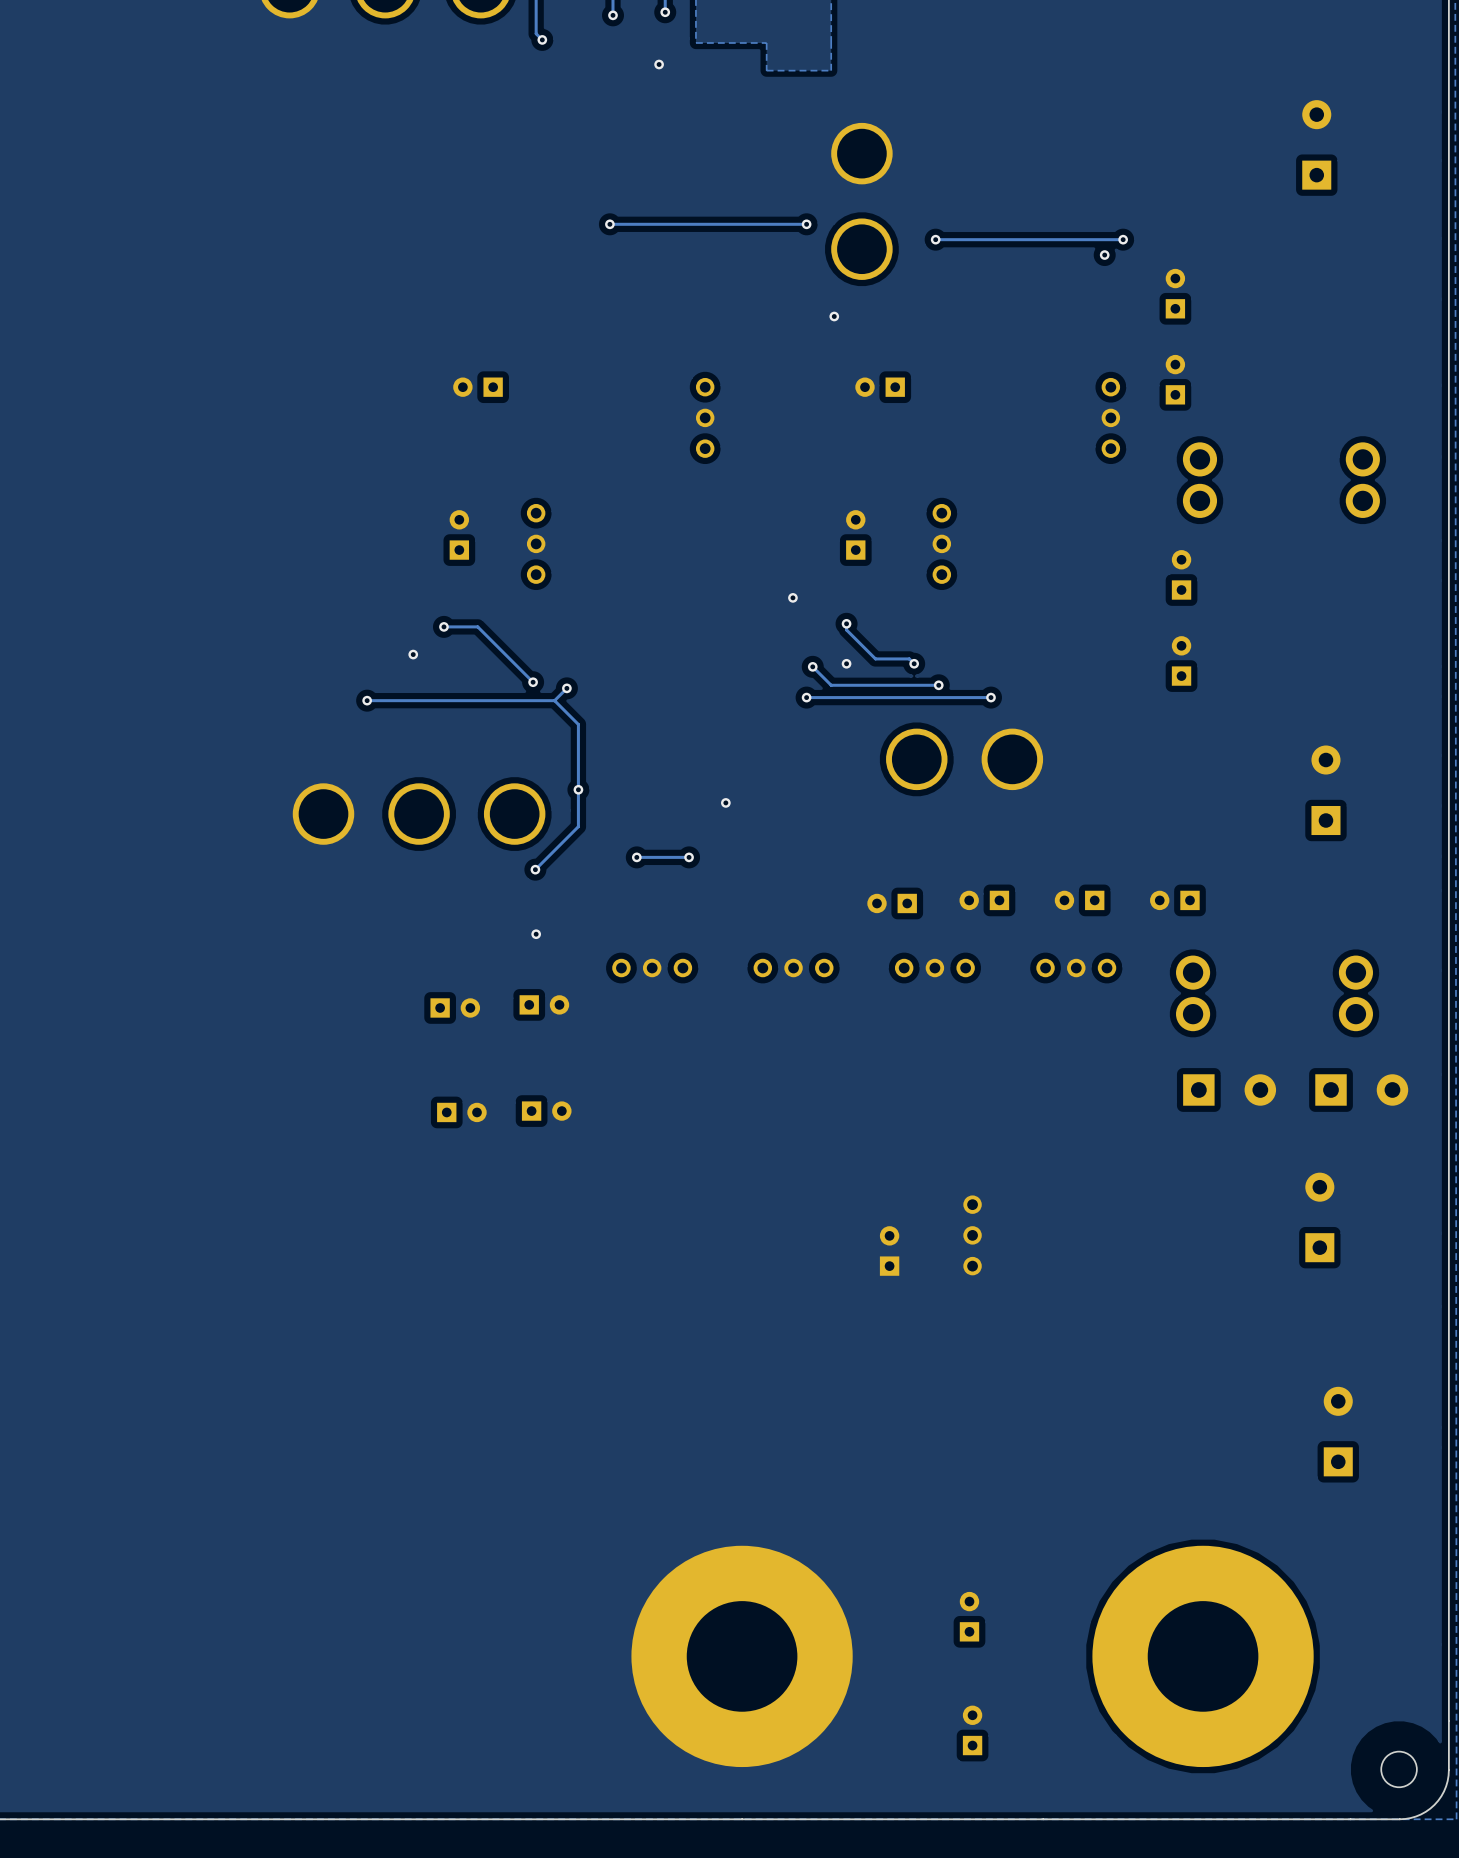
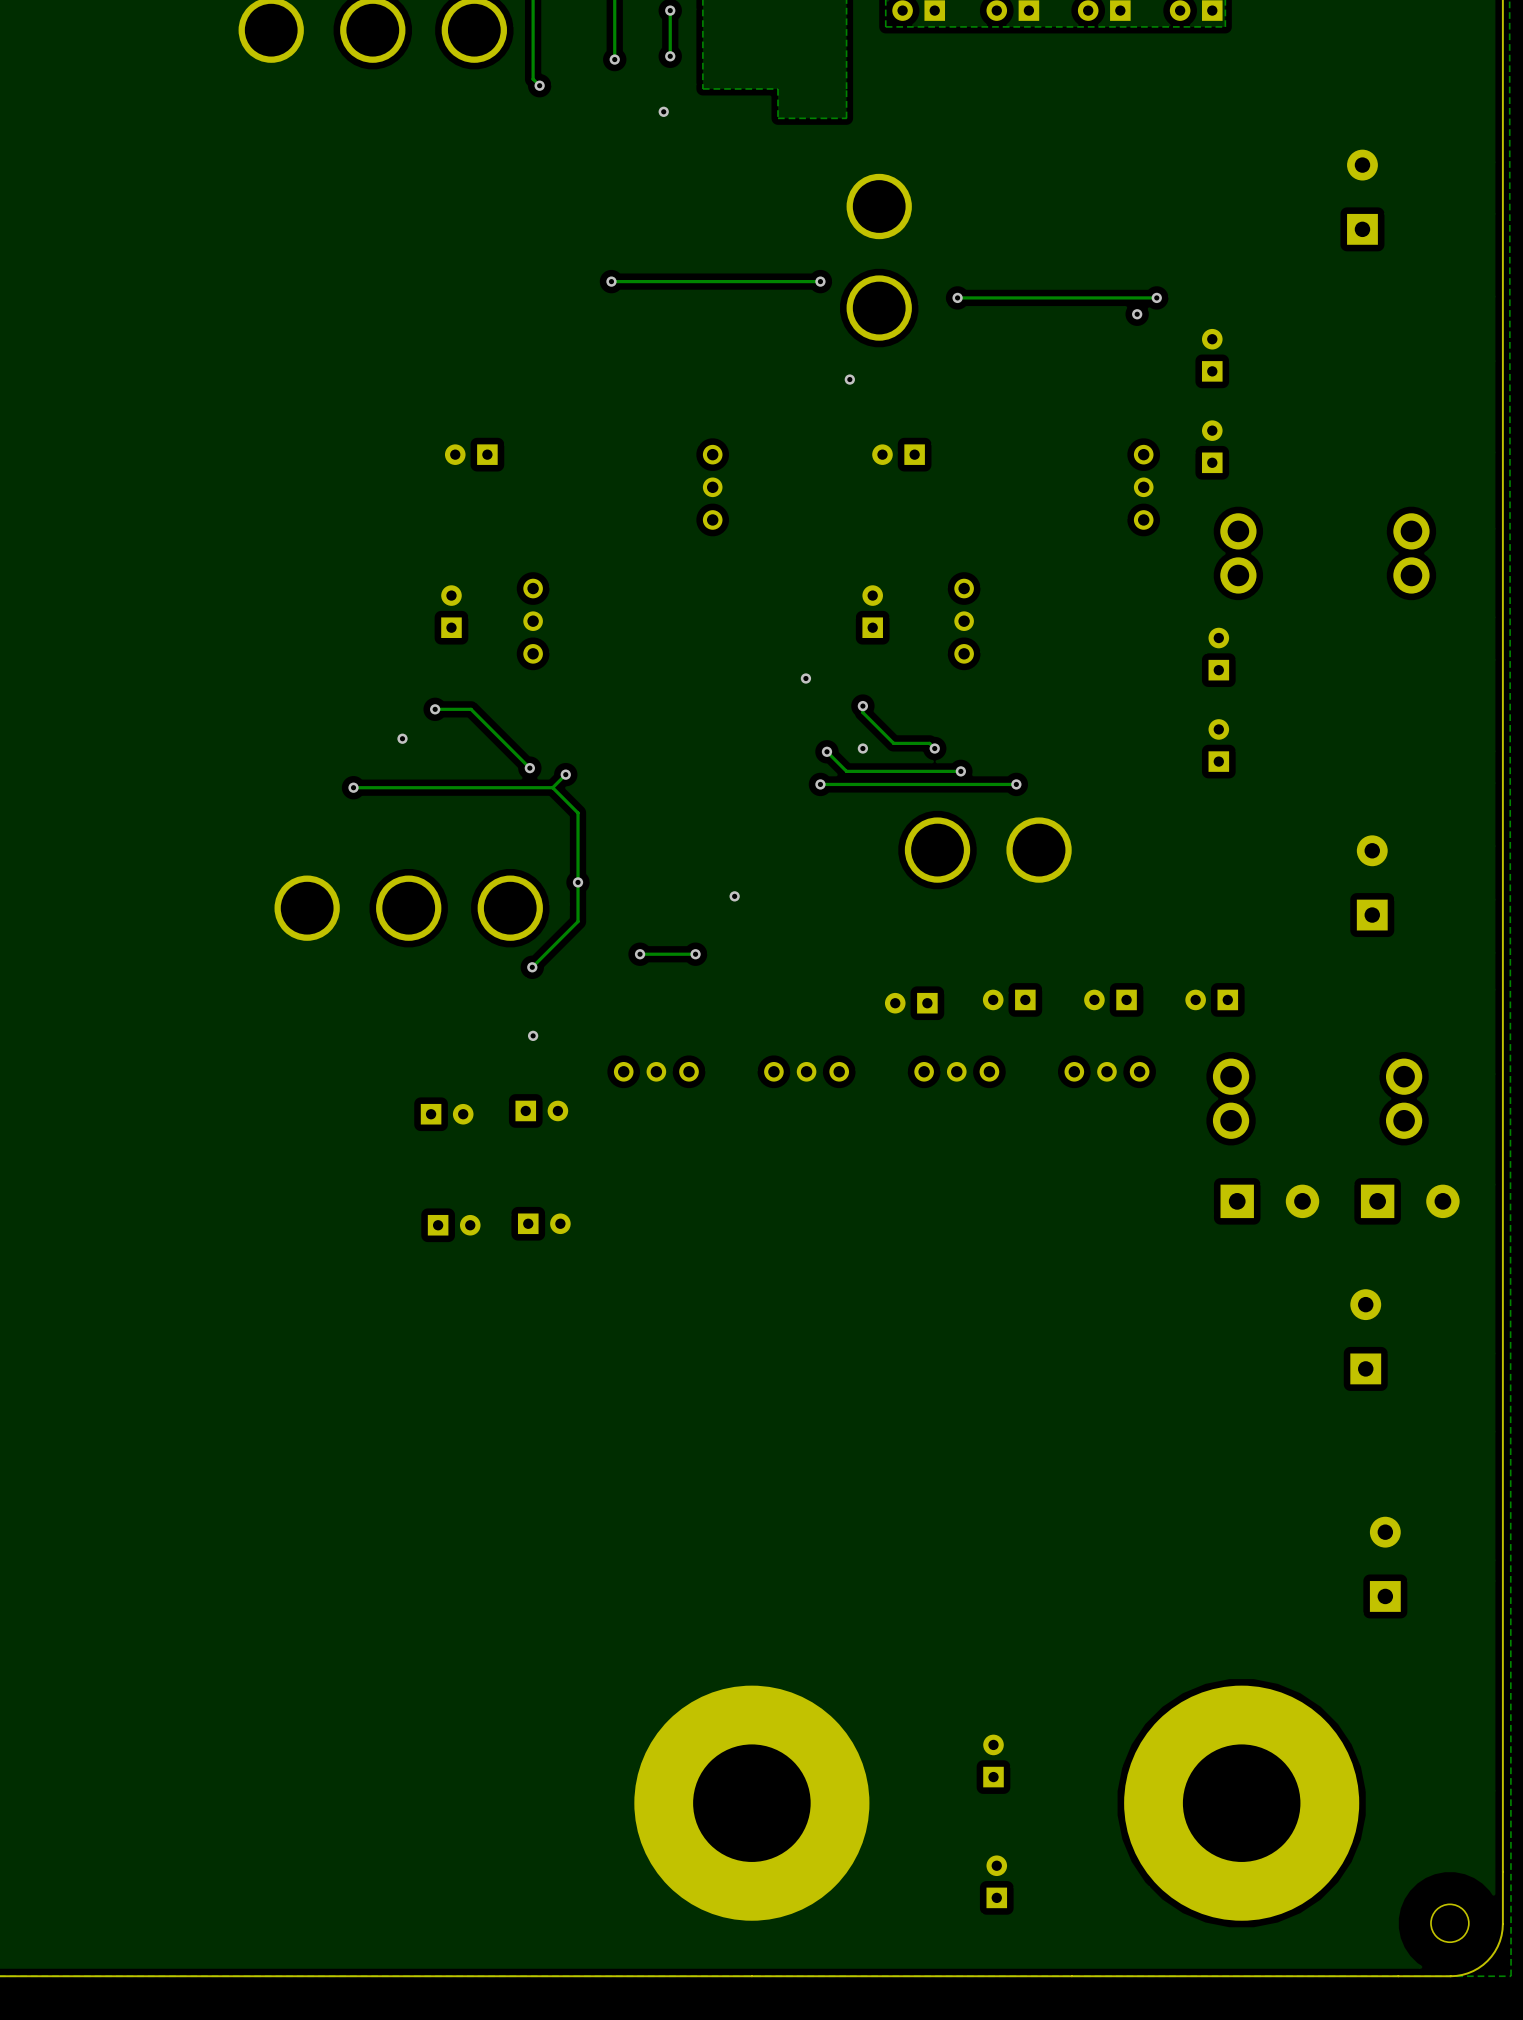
part: (972, 1235) -> none
part: (889, 1250) -> none

